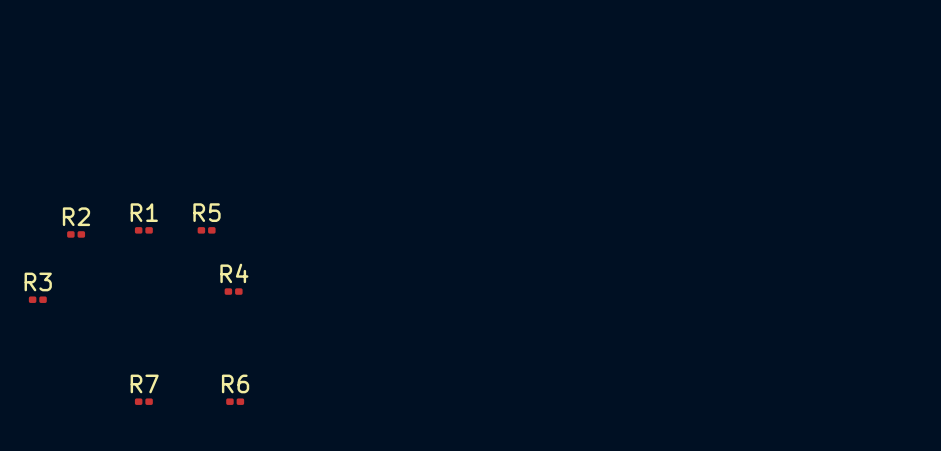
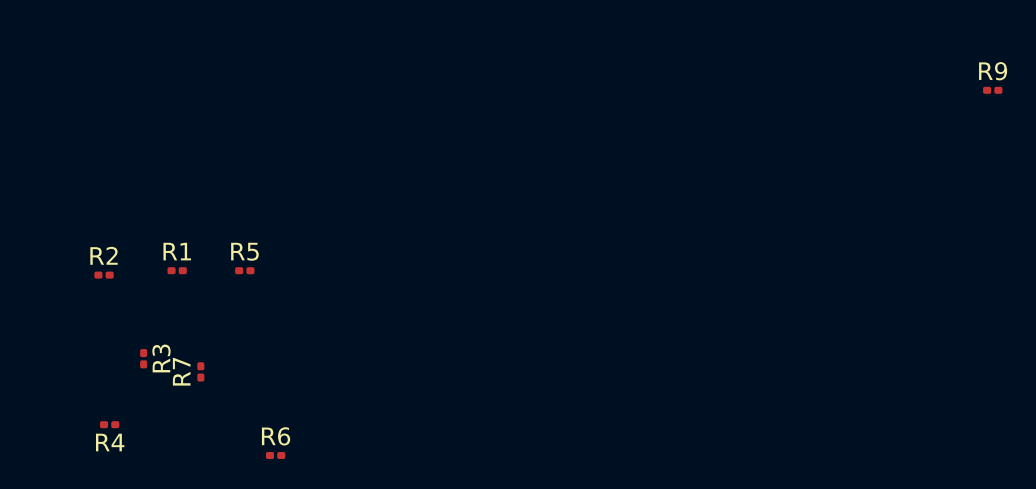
R9: none -> (992, 90)
R4 name position: R4 (234, 273) -> R4 (110, 442)
R4 position: (233, 291) -> (109, 424)
R3 rotation: 0° (37, 299) -> 90° clockwise (143, 358)
R3 position: (37, 299) -> (143, 358)
R7 rotation: 0° (143, 401) -> 90° clockwise (200, 371)
R7 position: (143, 401) -> (200, 371)

